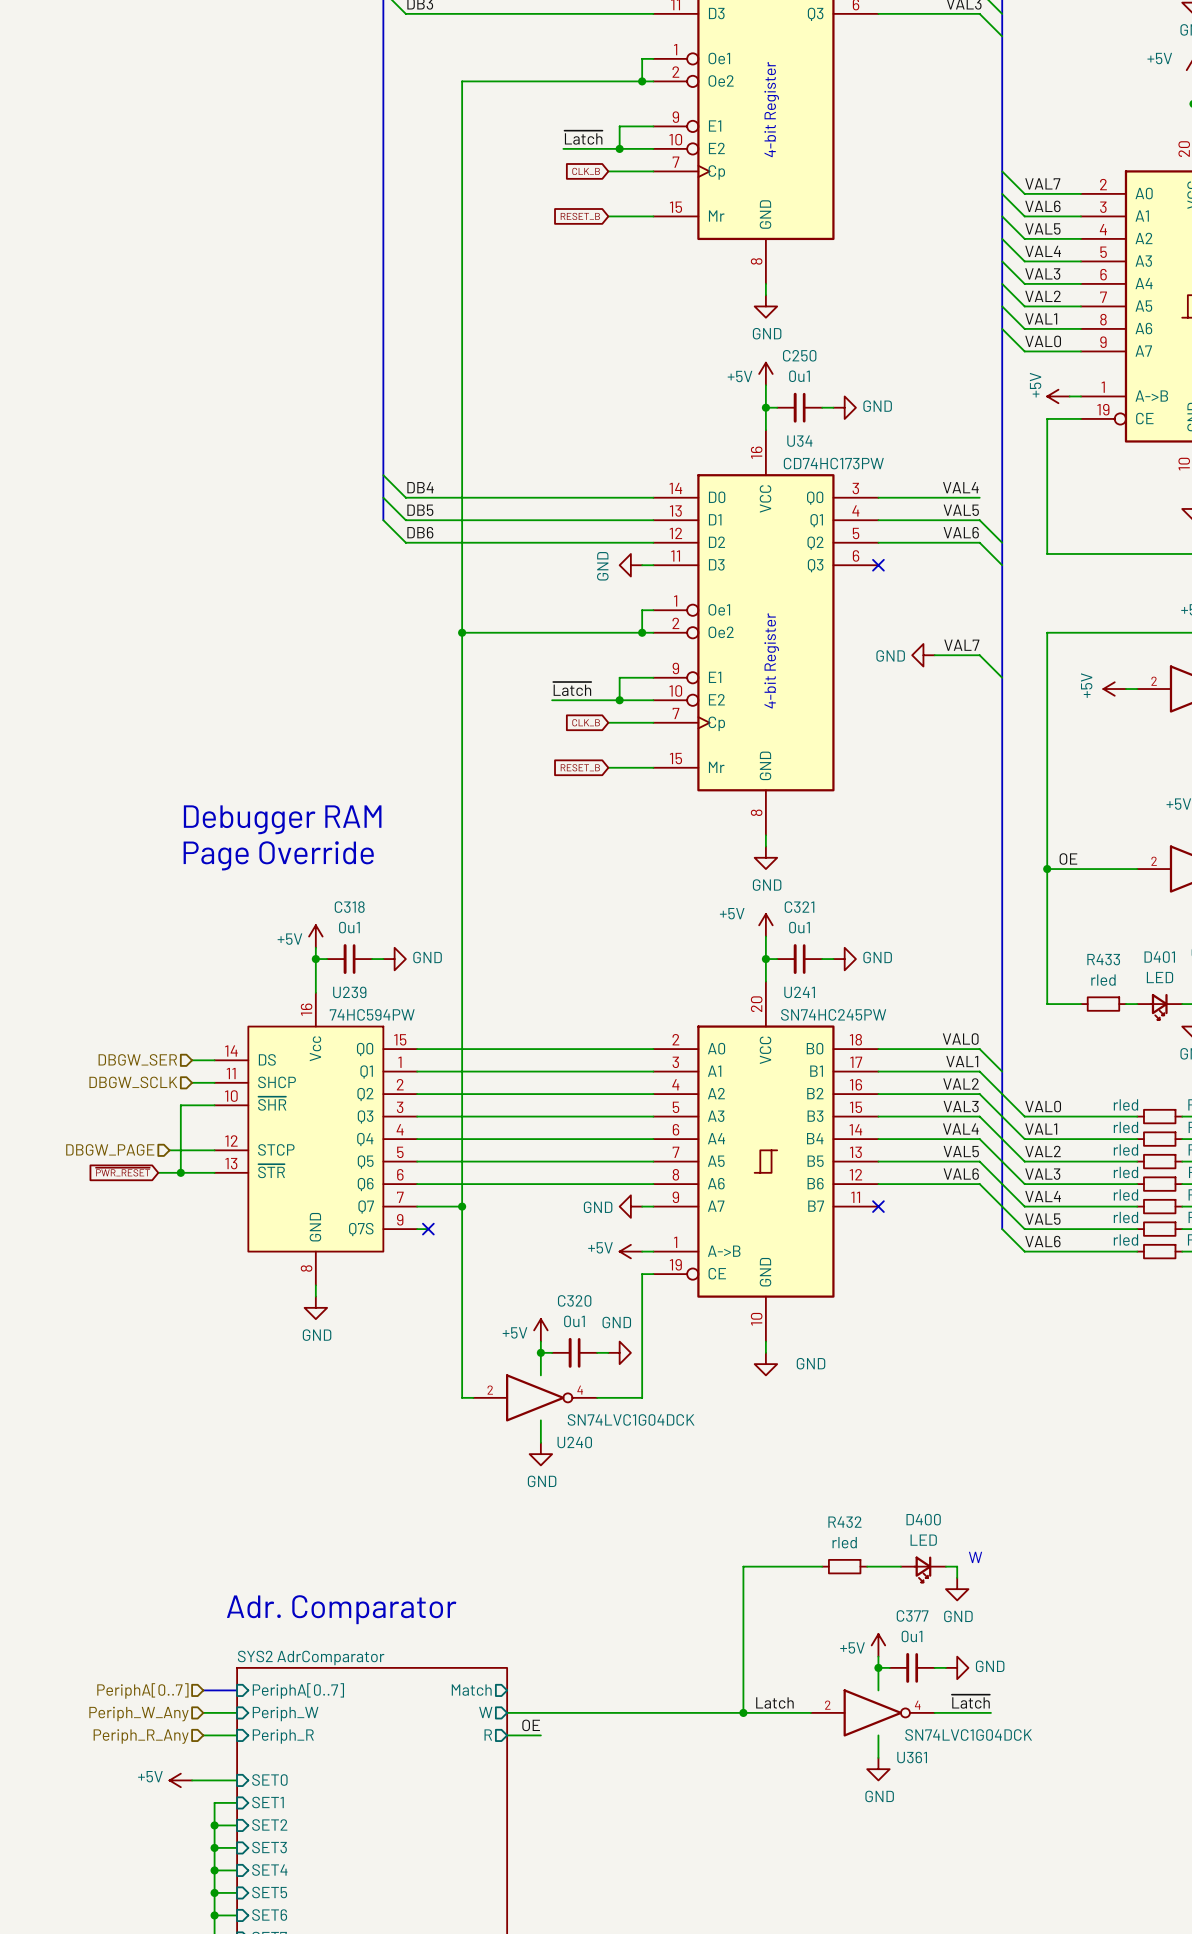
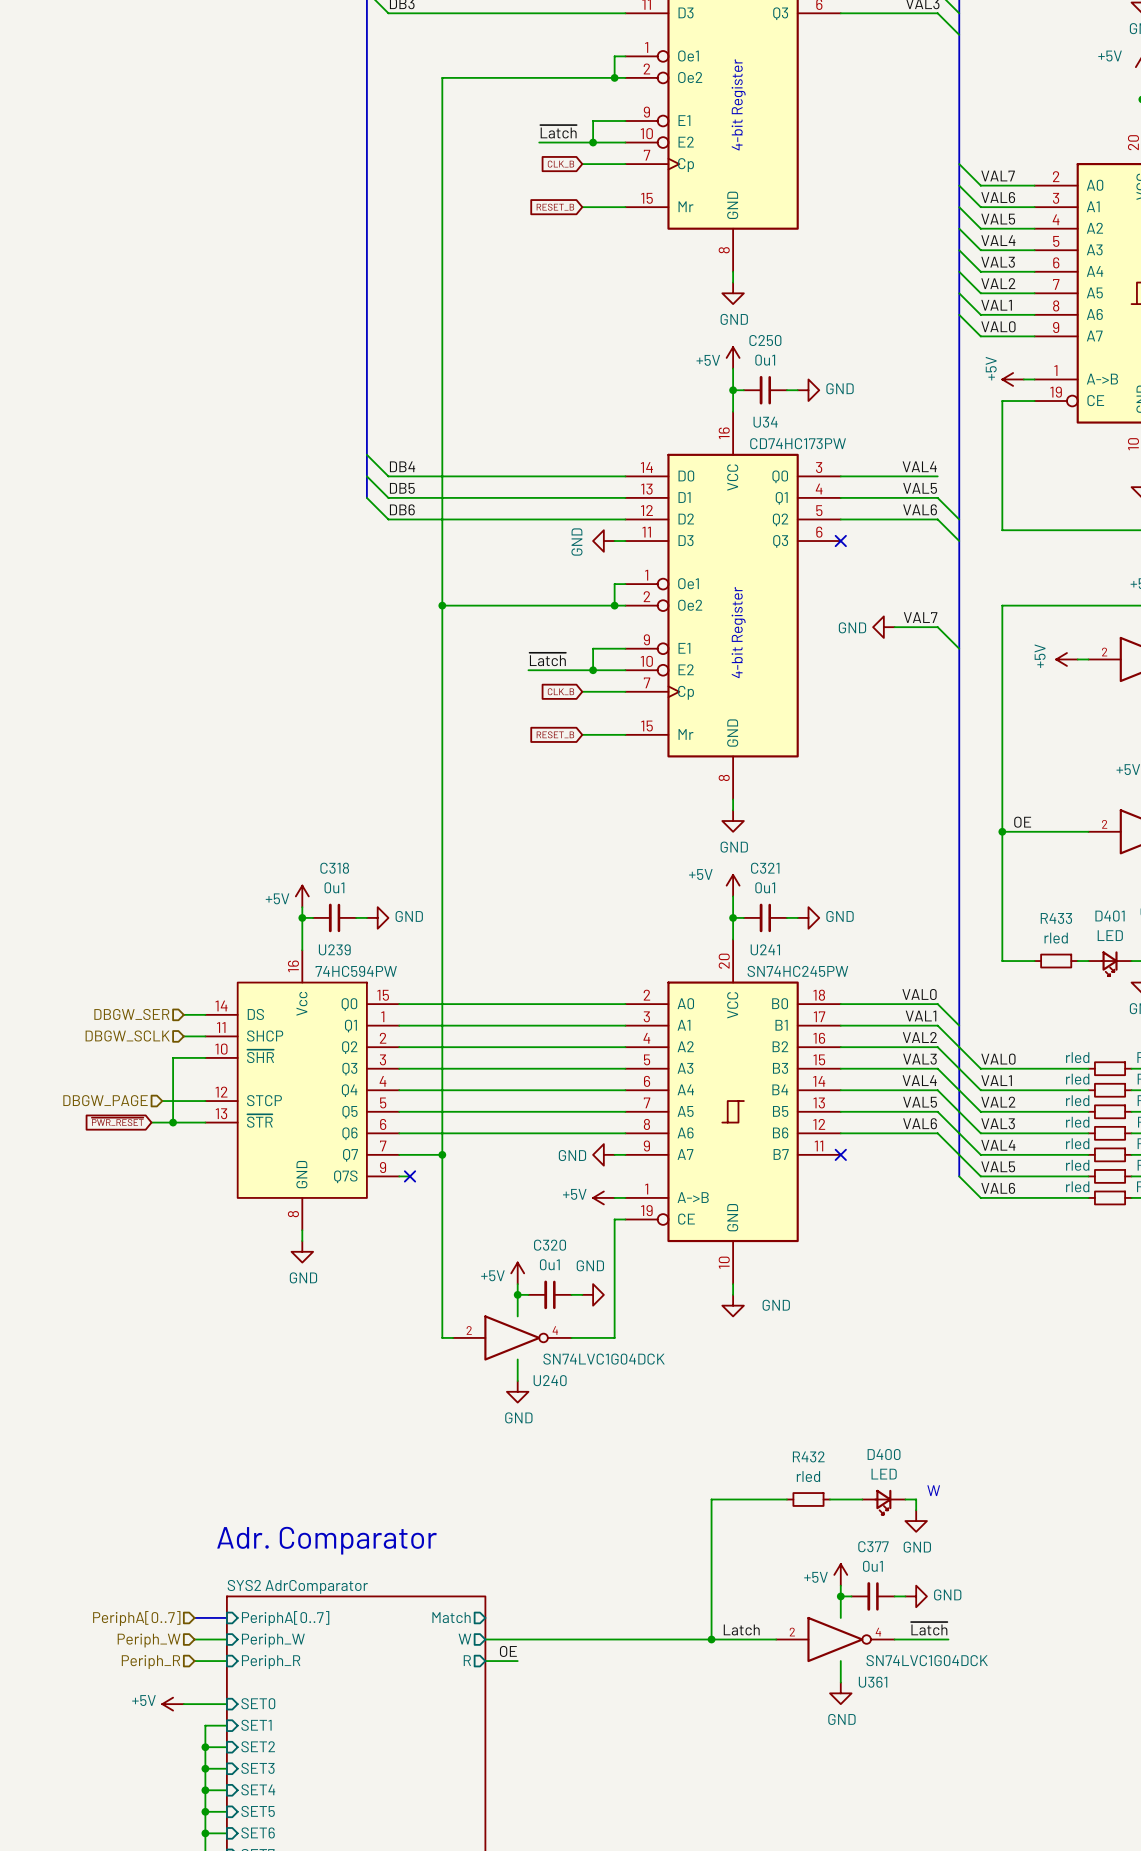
text: Debugger RAM (282, 819) -> none
text: Page Override (278, 855) -> none
hierarchical label: Periph_W_Any (139, 1714) -> Periph_W (149, 1640)
hierarchical label: Periph_R_Any (141, 1736) -> Periph_R (150, 1662)

